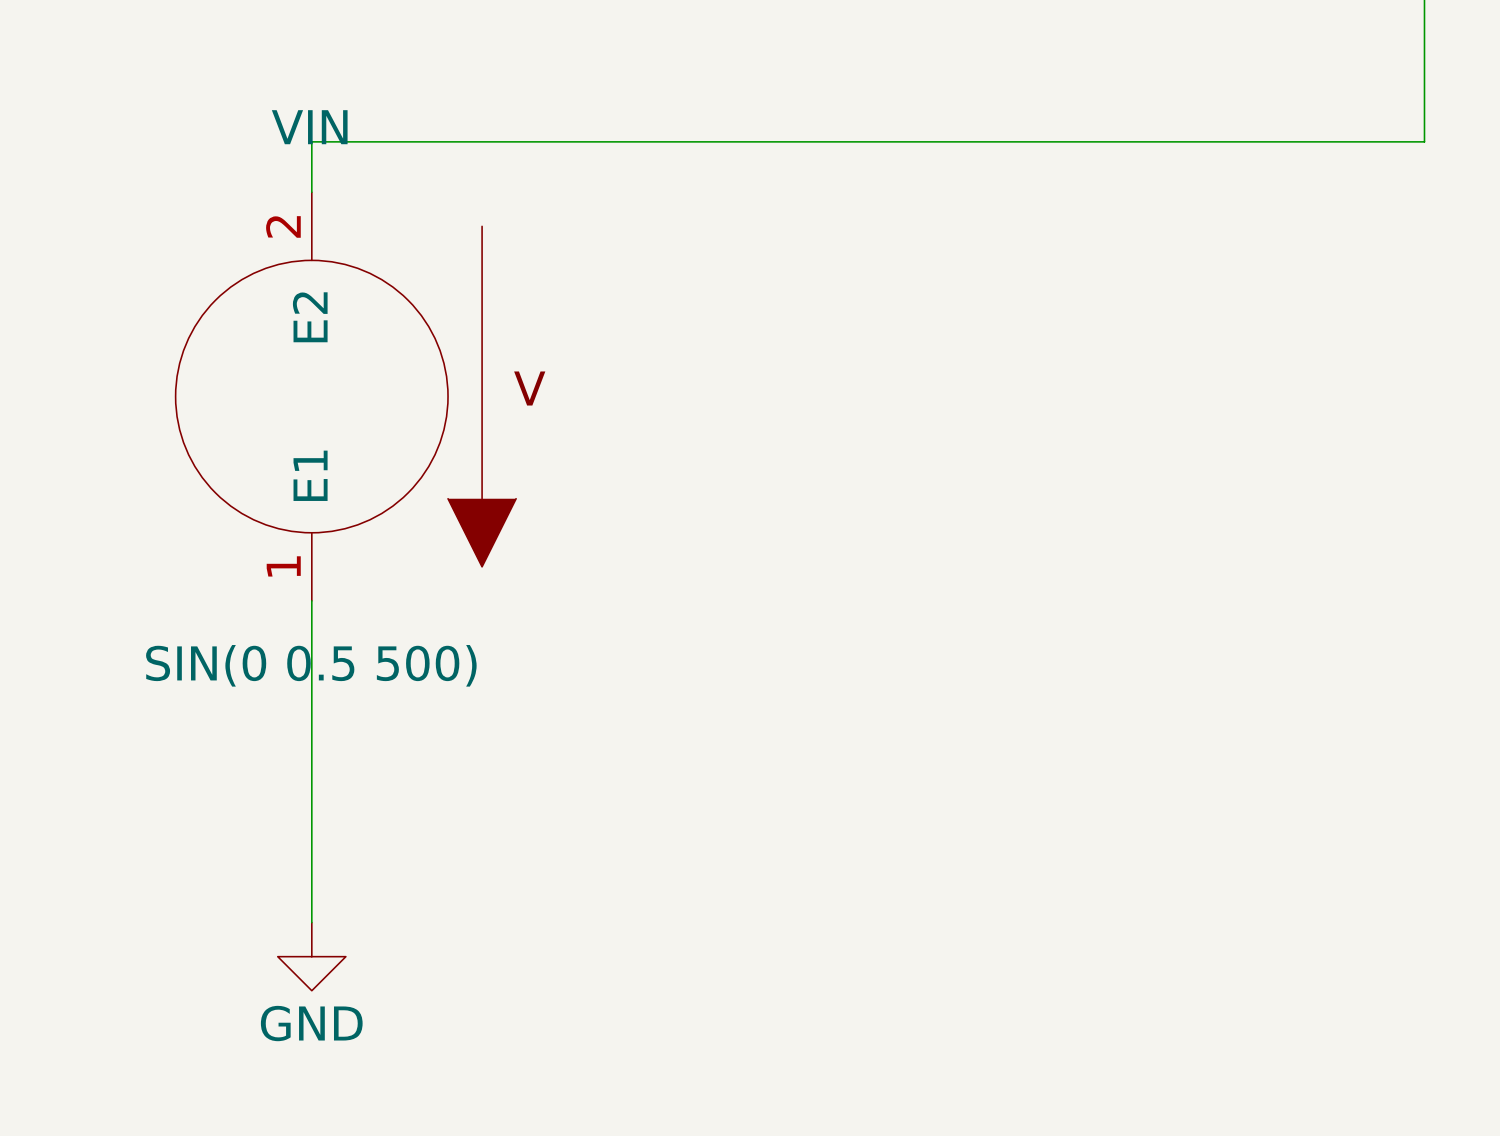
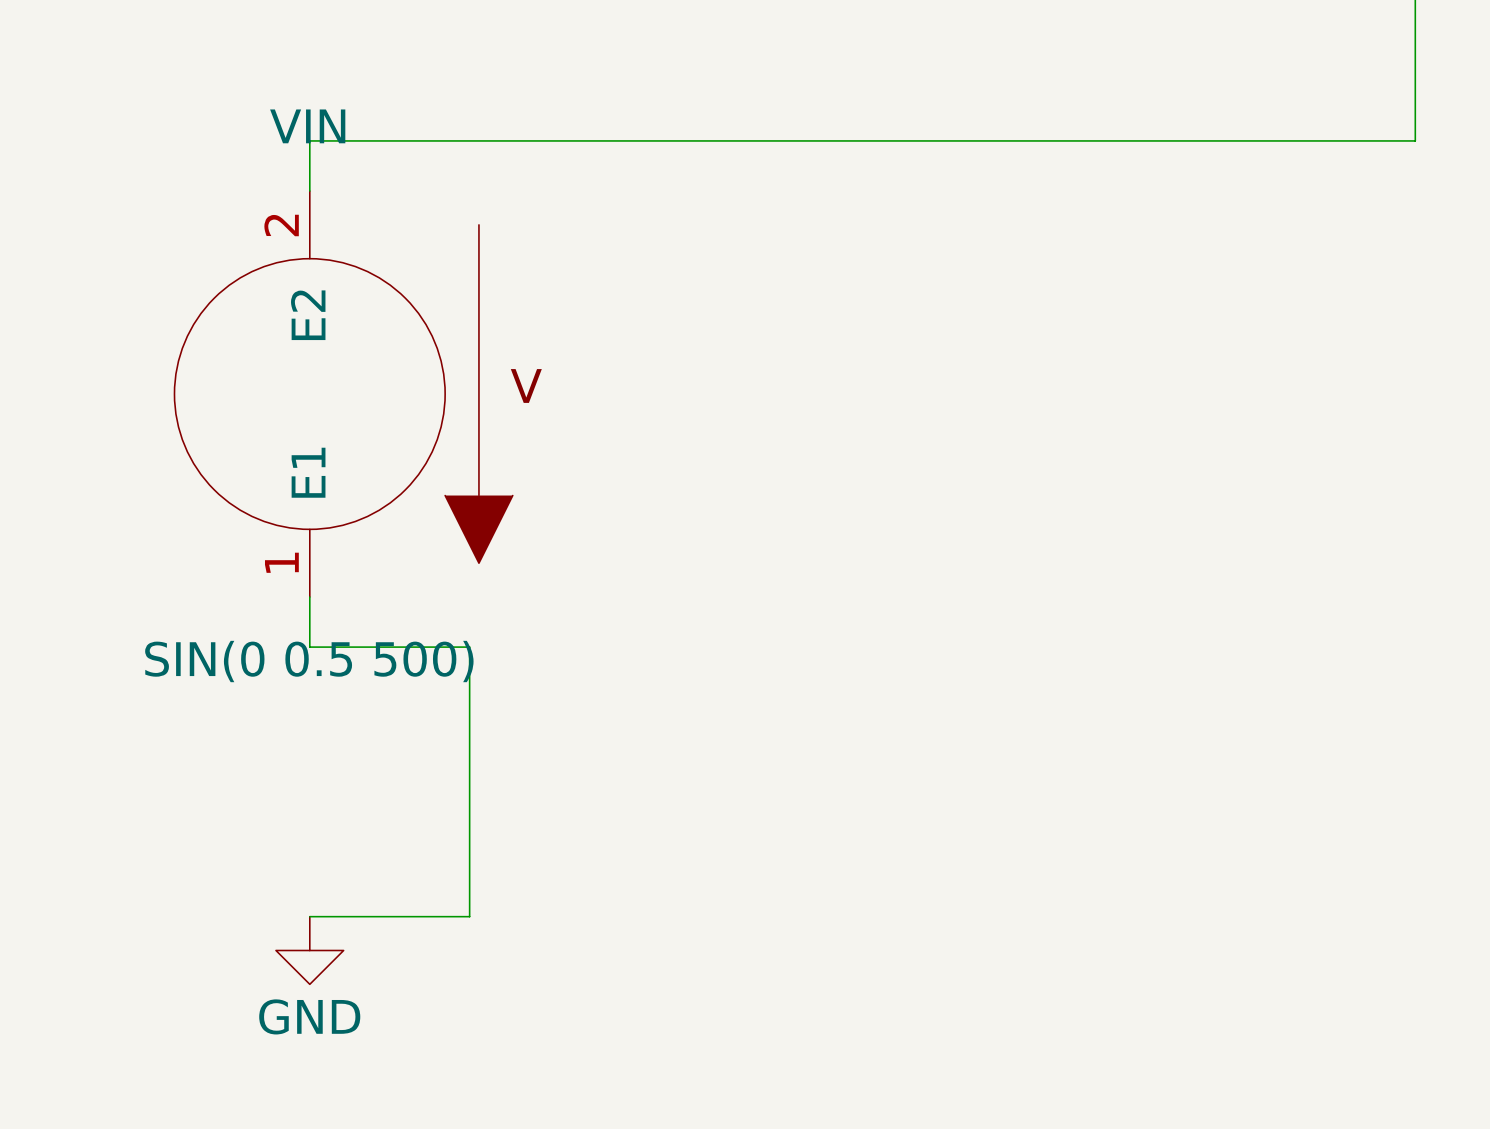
wire: (311, 651) (311, 922) -> (309, 647) (469, 647) (469, 916) (309, 916)

